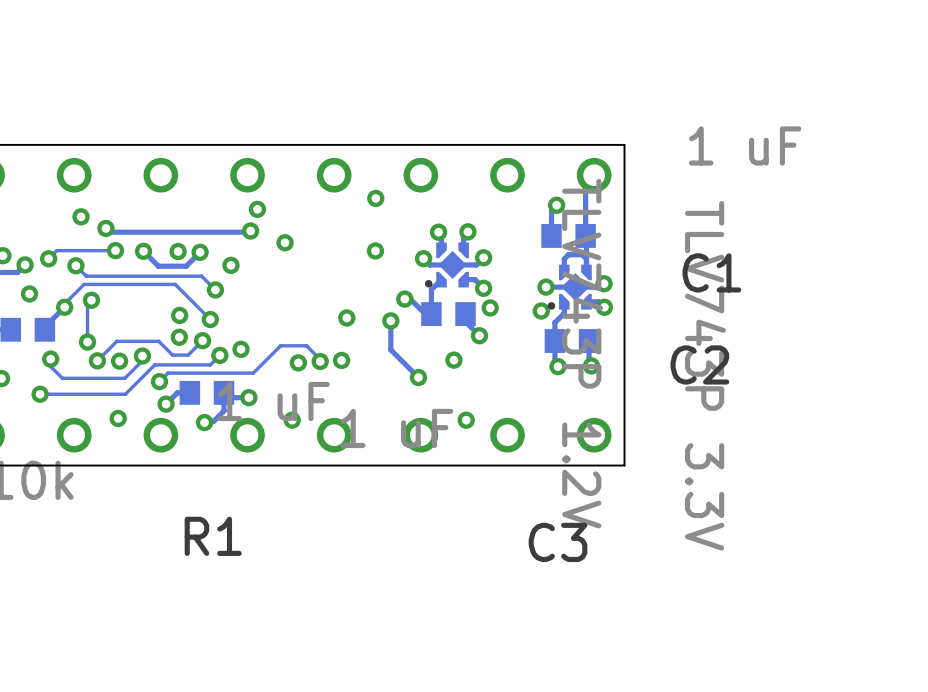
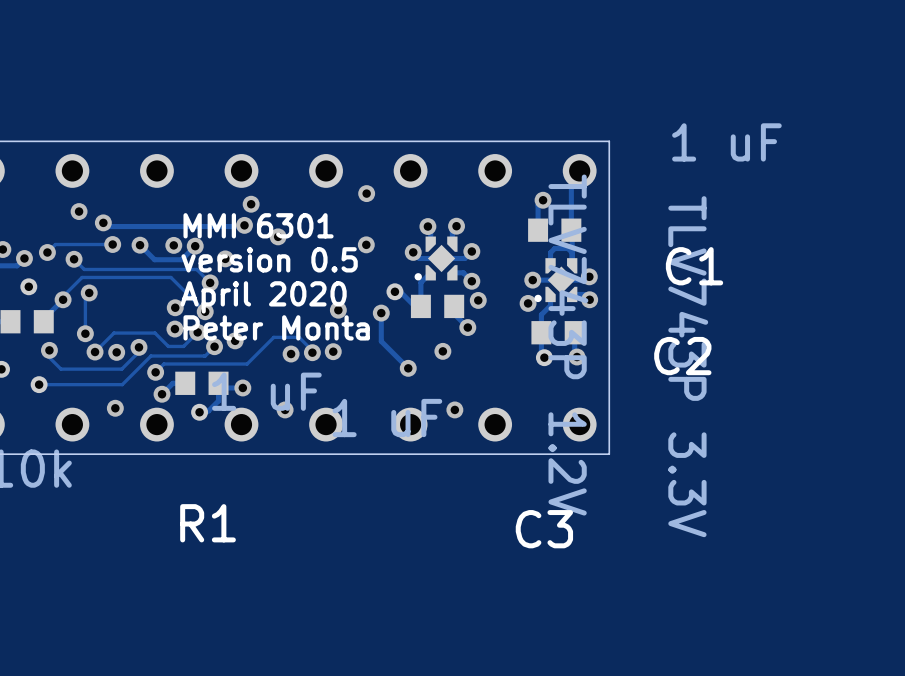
text: none -> MMI 6301 (258, 225)
text: none -> version 0.5 (269, 259)
text: none -> April 2020 (263, 297)
text: none -> Peter Monta (276, 327)

